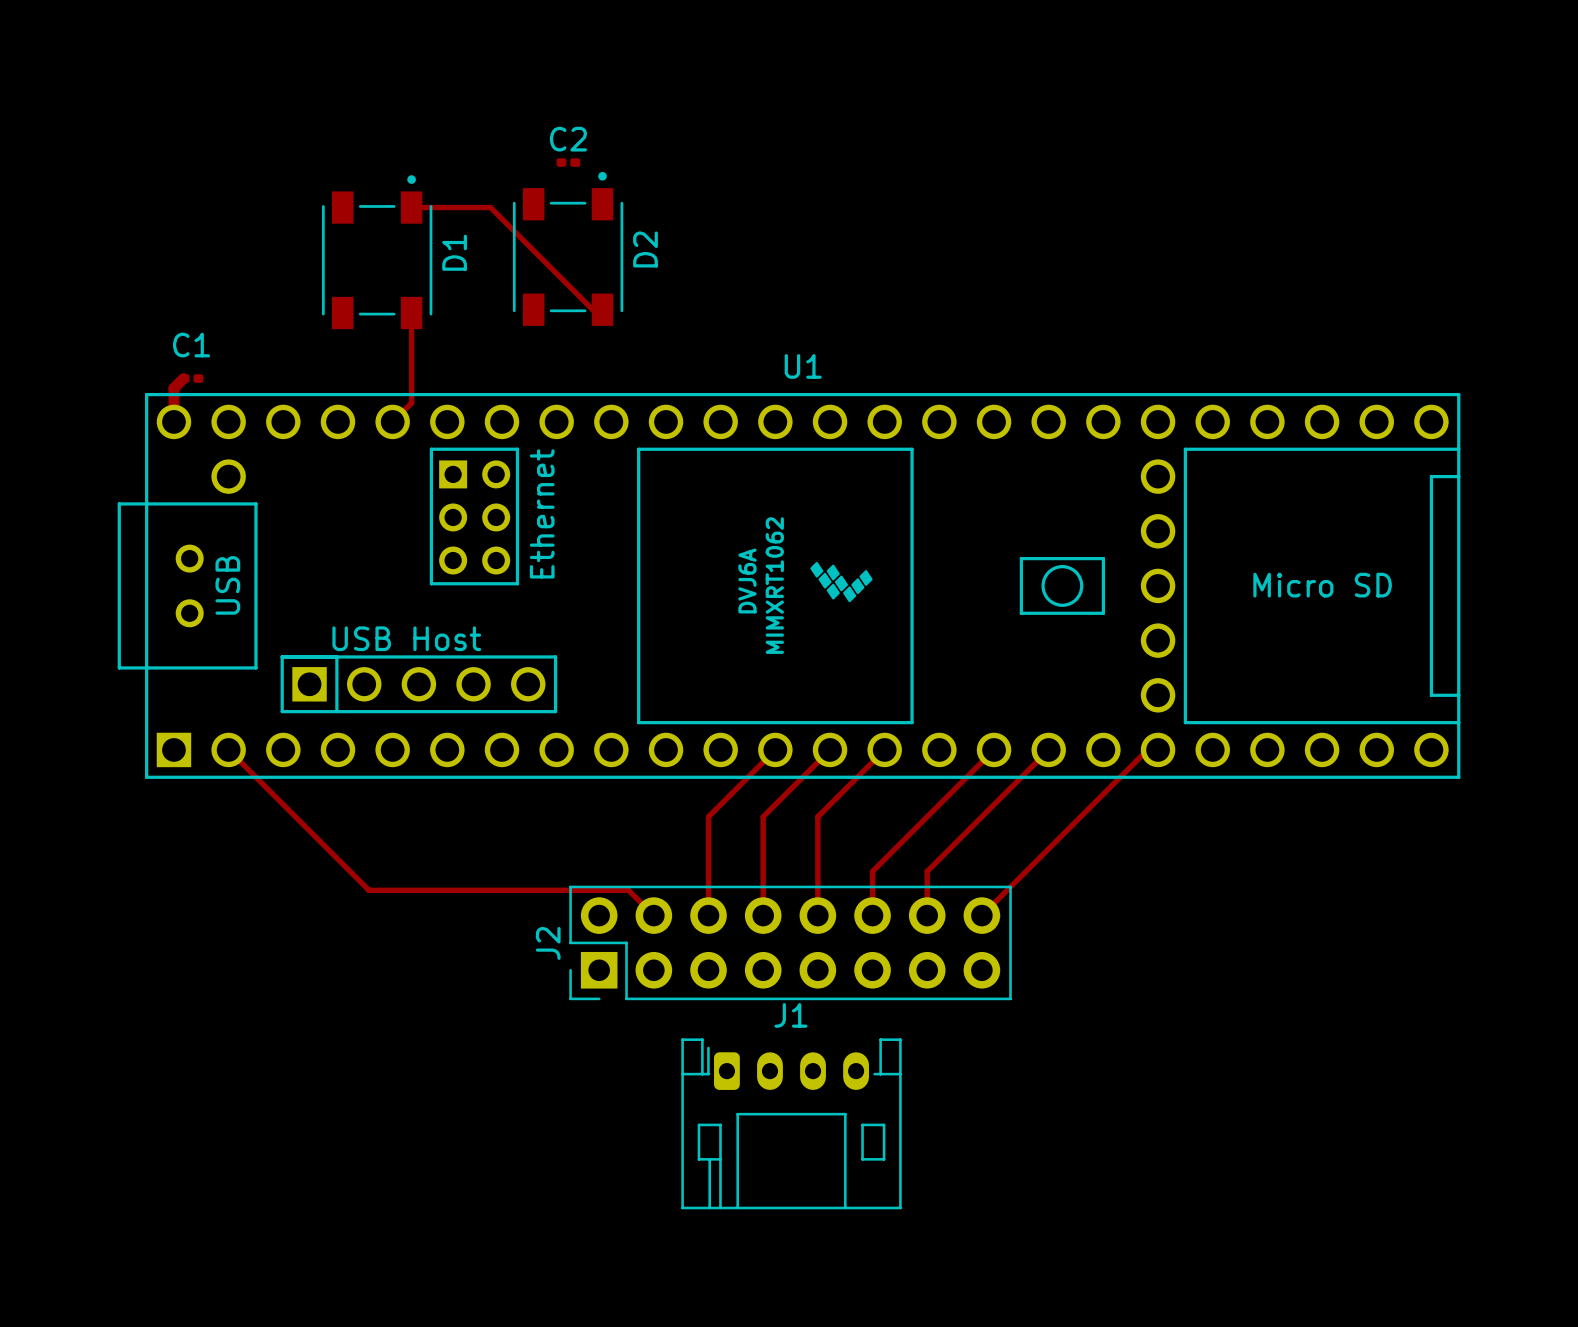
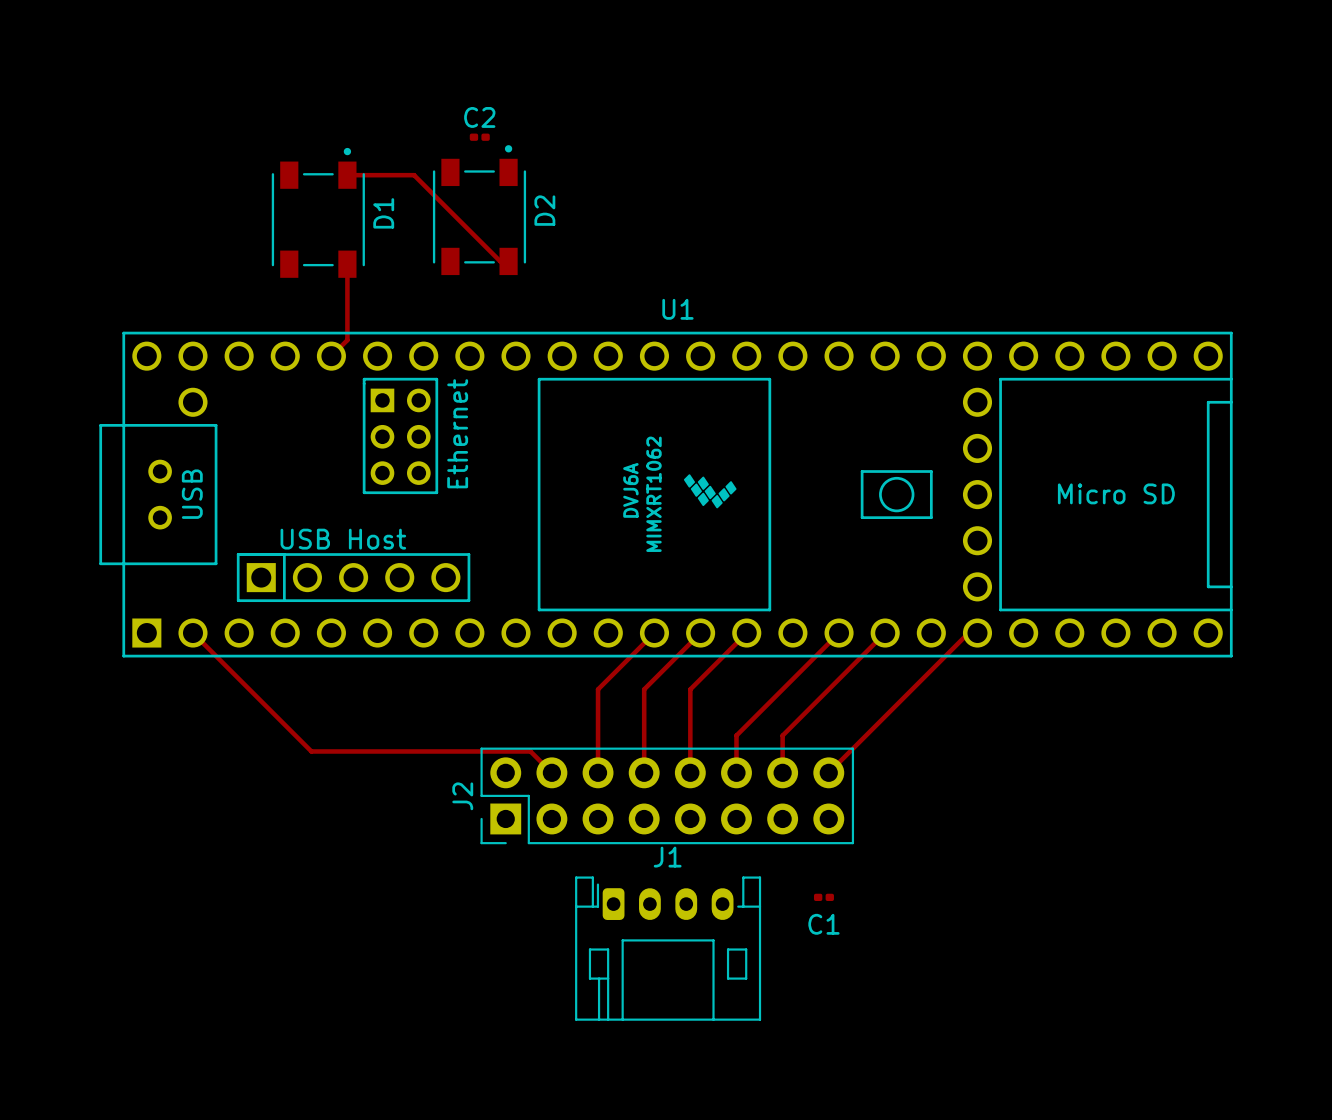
C1 name position: C1 (191, 345) -> C1 (823, 924)
track: (183, 378) (173, 388) (173, 421) -> none
C1 position: (191, 378) -> (823, 897)

